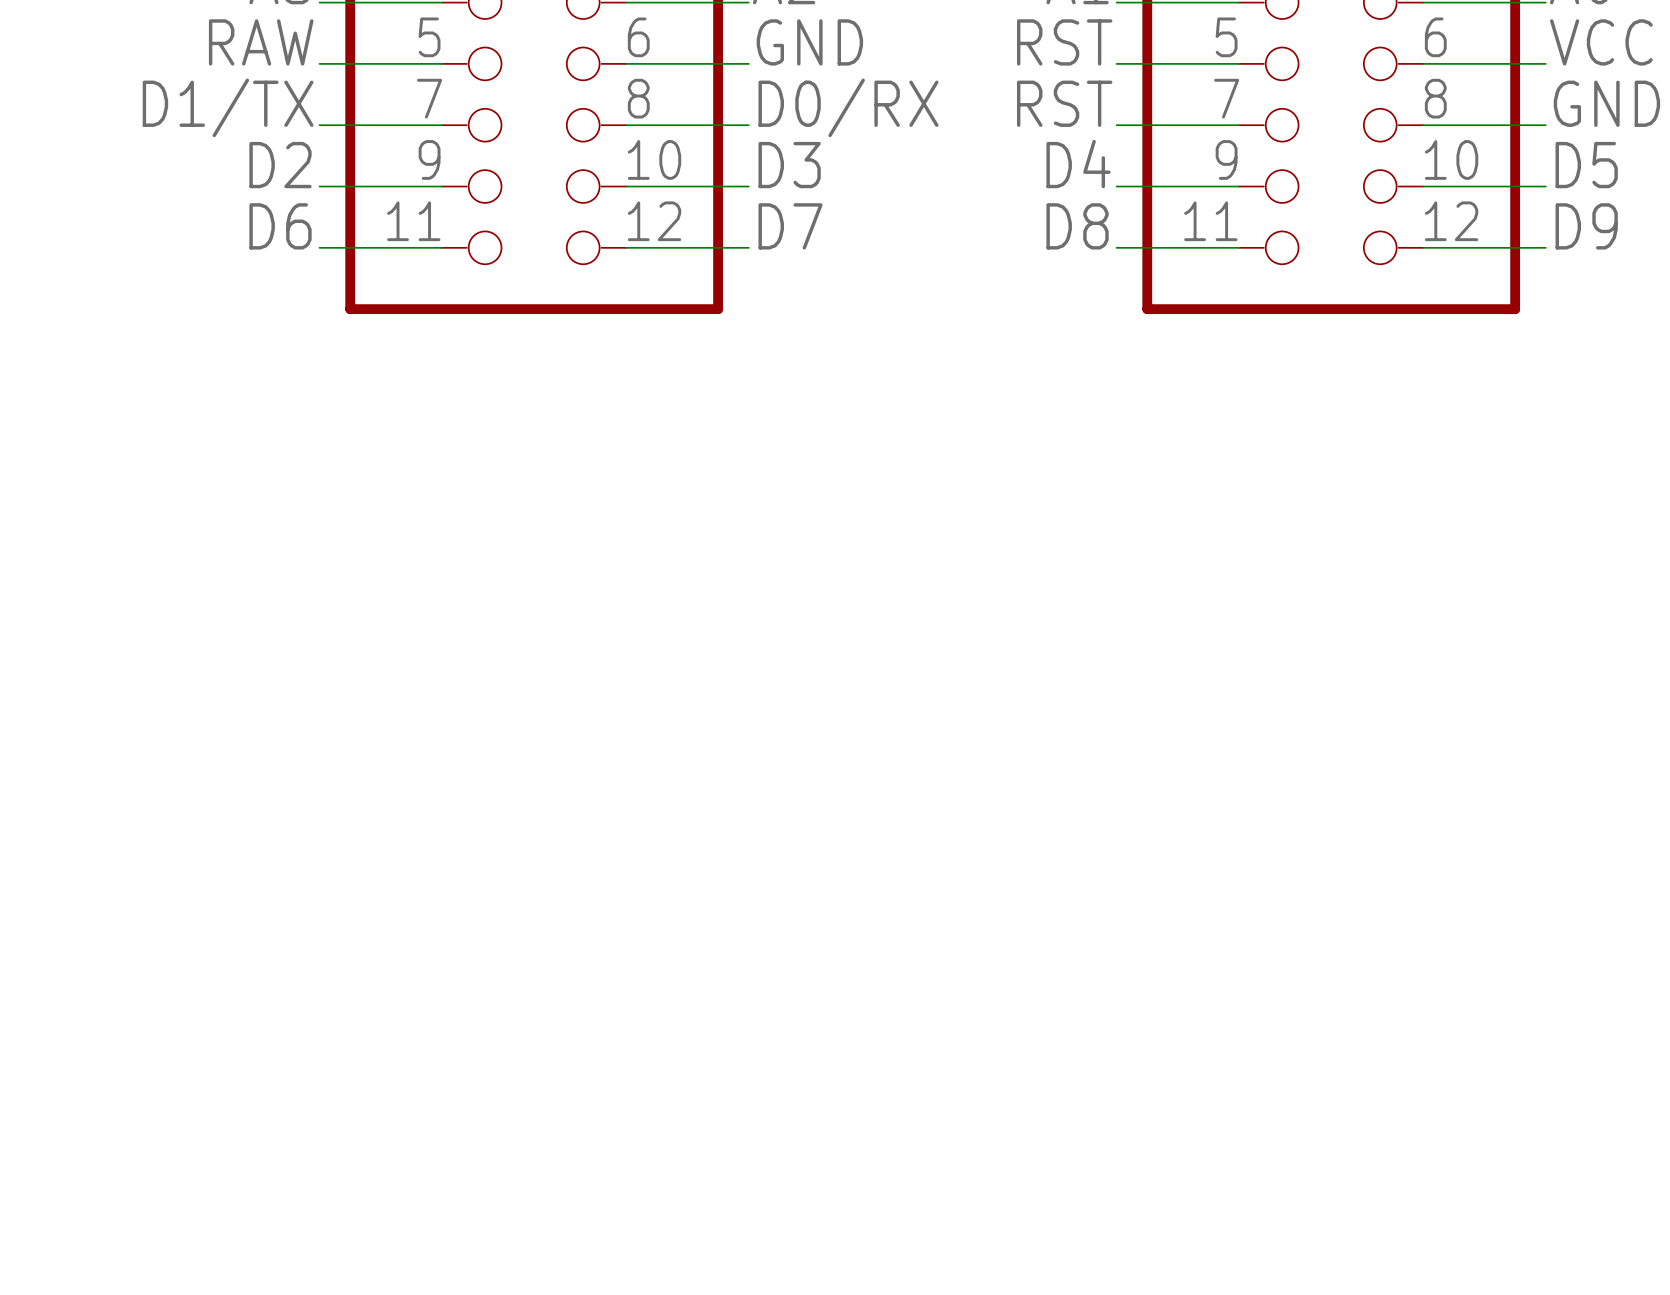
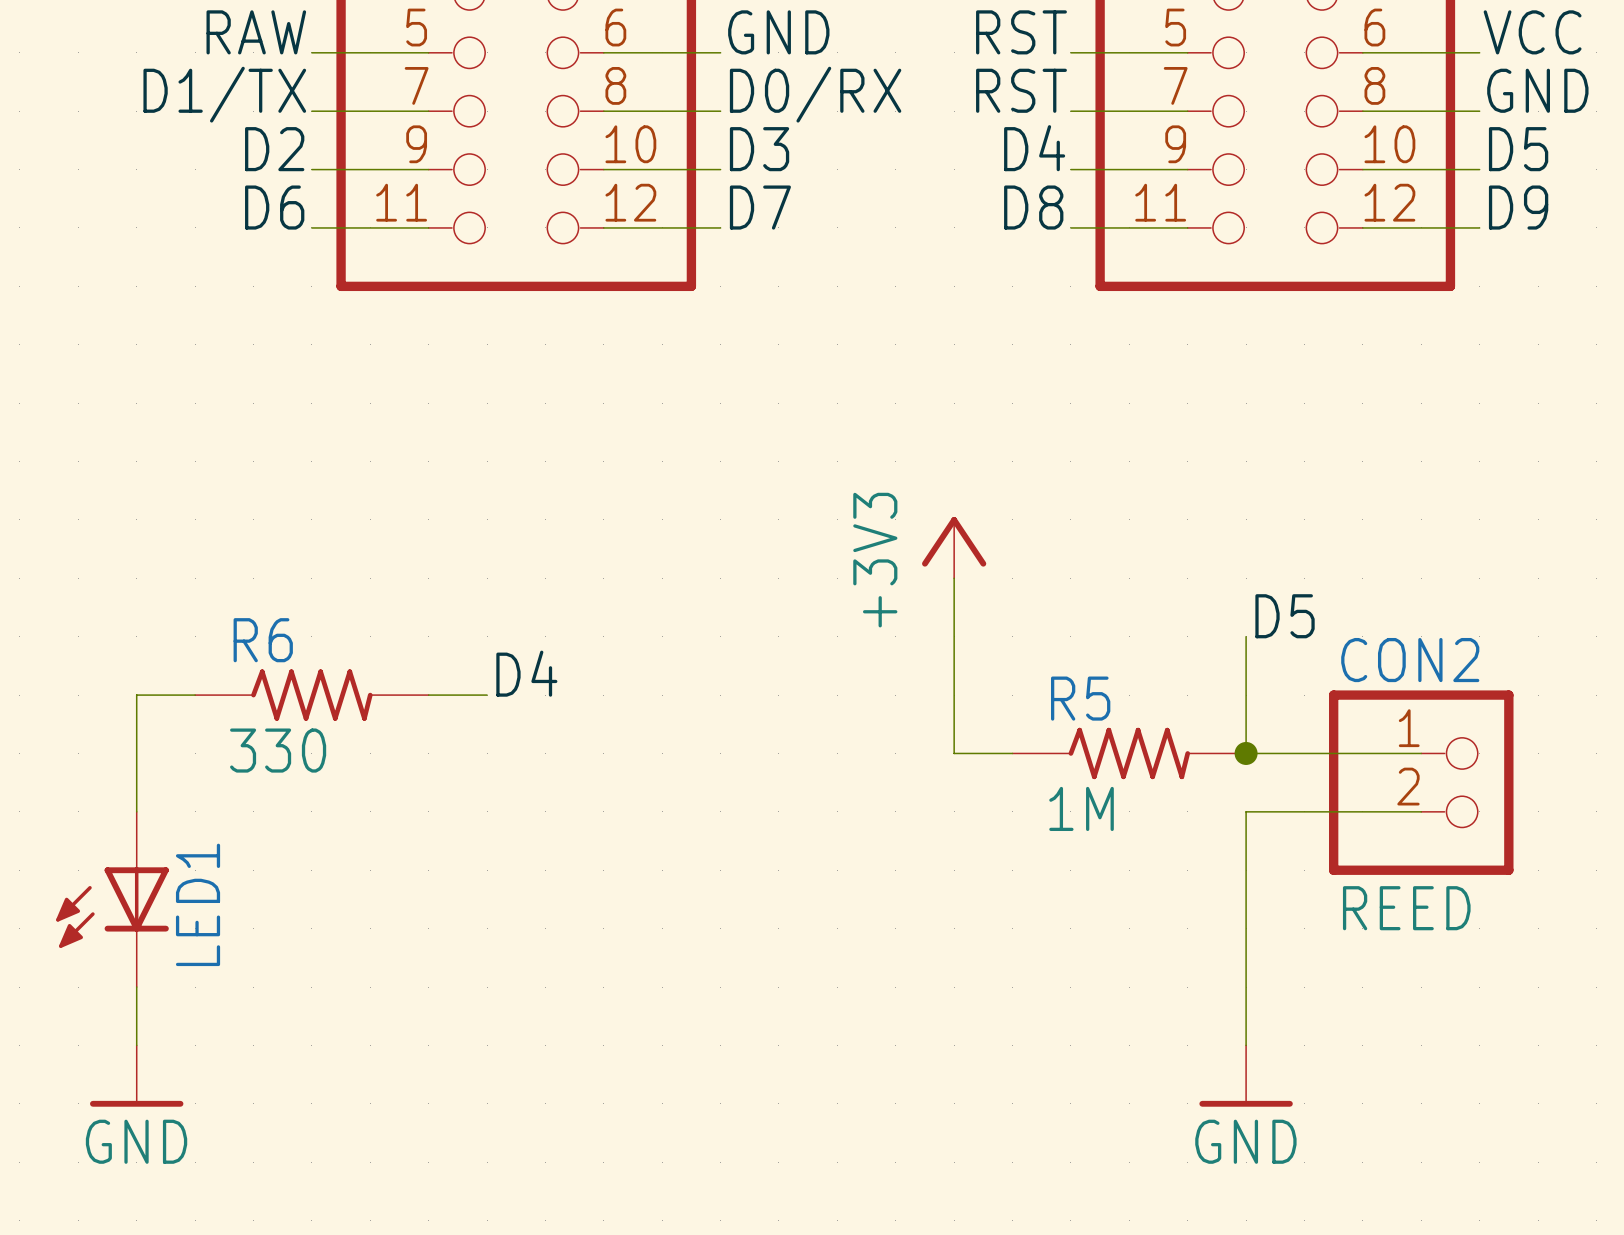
power symbol: none -> +3V3 (954, 547)
wire: none -> (954, 578) (954, 753) (1012, 753)
label: none -> D5 (1285, 616)
wire: none -> (1246, 636) (1246, 753) (1421, 753)
label: none -> D4 (526, 673)
wire: none -> (195, 695) (136, 695) (136, 811)
R6: none -> 330 (311, 695)
wire: none -> (428, 695) (487, 695)
R5: none -> 1M (1129, 753)
junction: none -> (1246, 753)
CON2: none -> REED (1421, 782)
wire: none -> (1421, 811) (1246, 811) (1246, 1045)
LED1: none -> (112, 899)
wire: none -> (136, 987) (136, 1045)
power symbol: none -> GND (136, 1076)
power symbol: none -> GND (1246, 1076)

